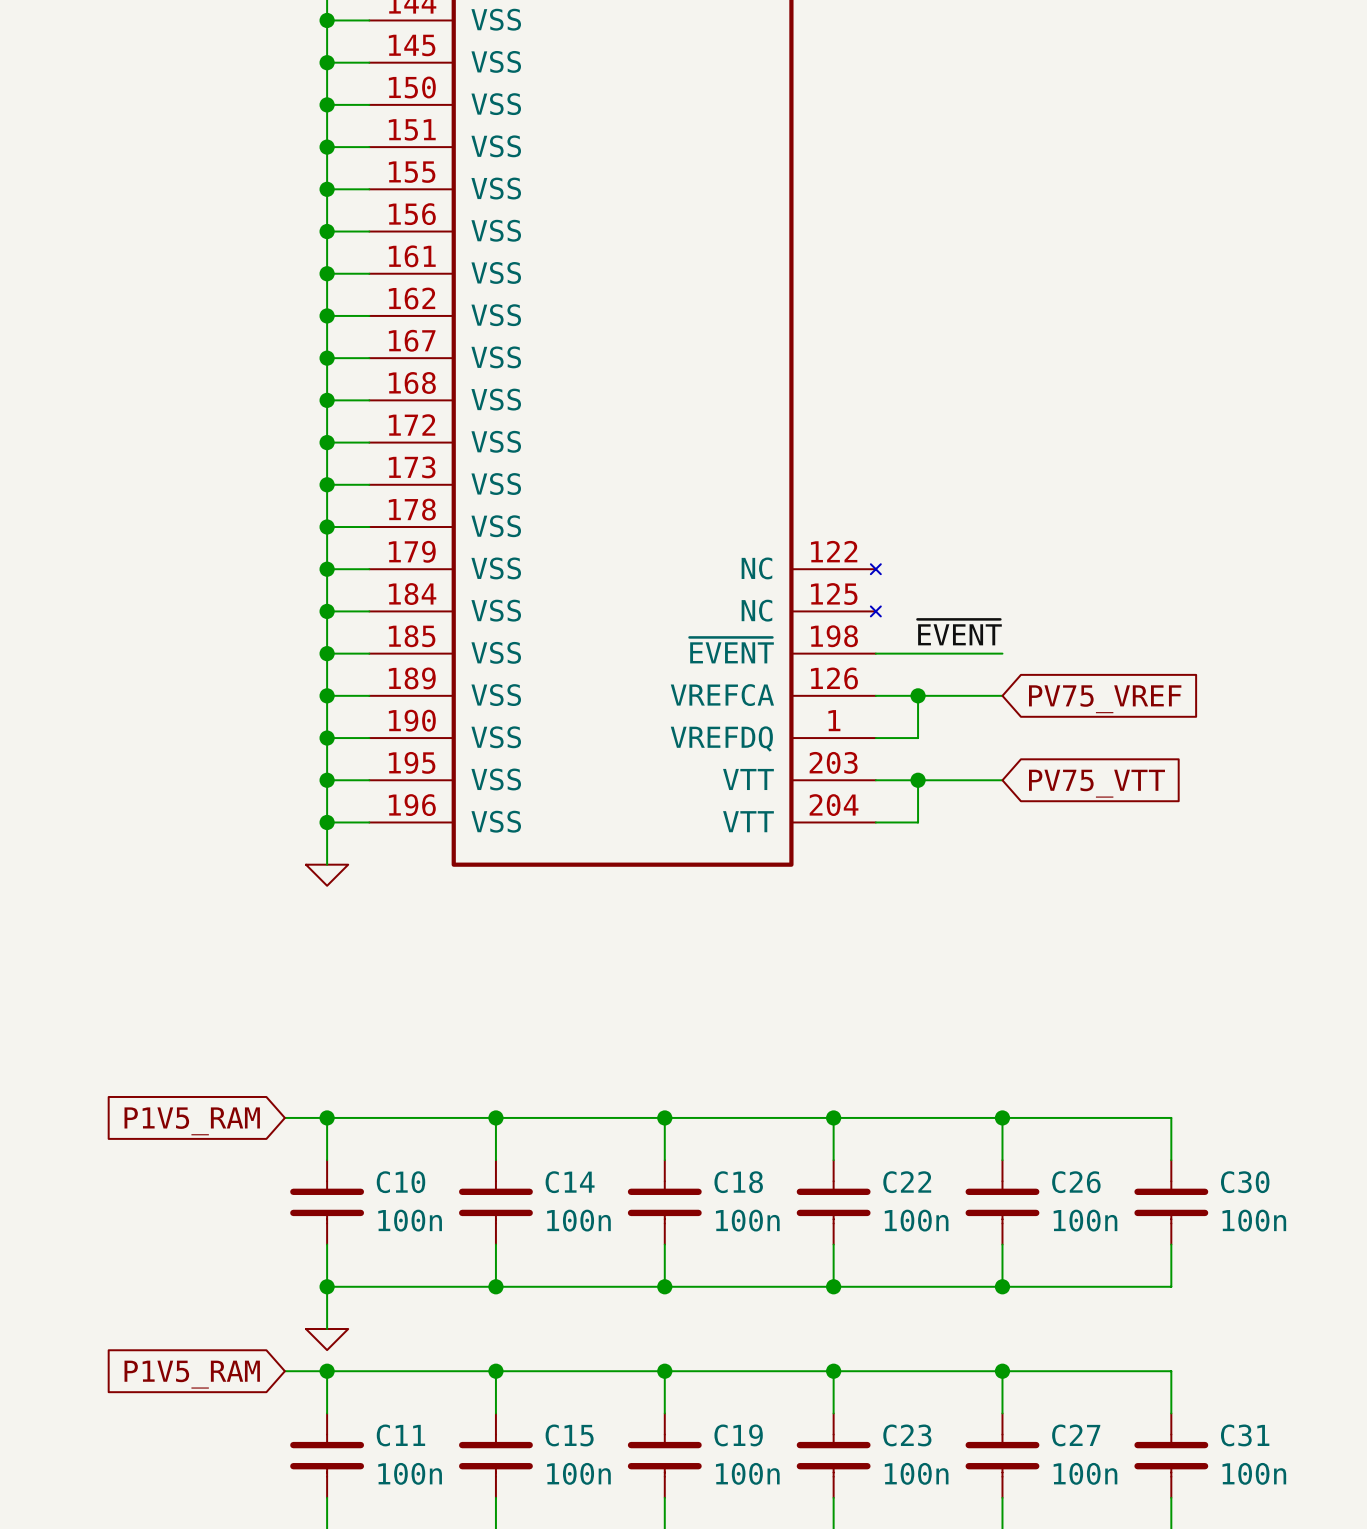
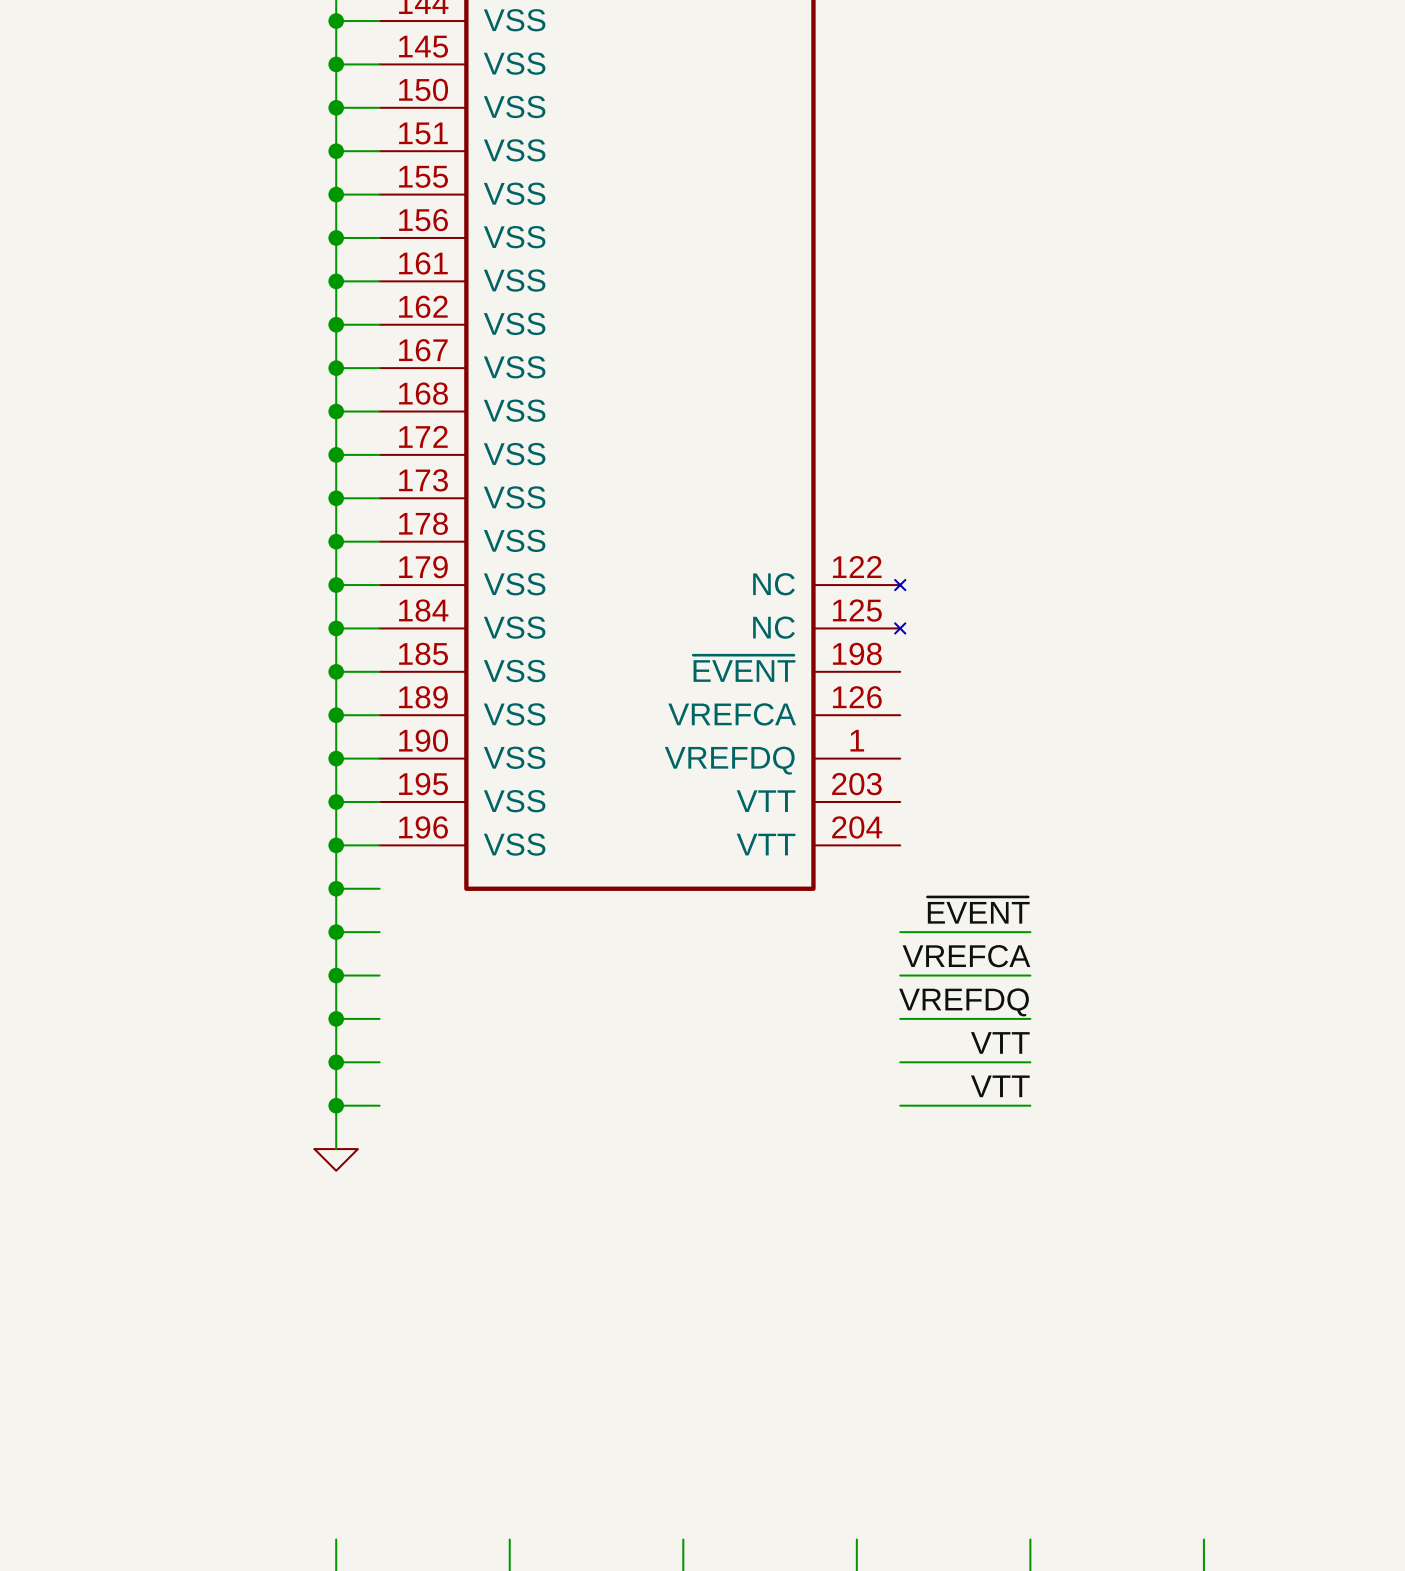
label position: ~{EVENT} (959, 632) -> ~{EVENT} (978, 910)
wire: (875, 653) (1002, 653) -> (900, 932) (1030, 932)
wire: (875, 695) (1002, 695) -> (900, 975) (1030, 975)
wire: (918, 695) (918, 738) (875, 738) -> none
junction: (918, 695) -> none
global label: PV75_VREF (1105, 699) -> none
wire: (875, 780) (1002, 780) -> (900, 1062) (1030, 1062)
wire: (918, 780) (918, 822) (875, 822) -> none
junction: (918, 780) -> none
global label: PV75_VTT (1096, 783) -> none
junction: none -> (336, 888)
power symbol: (327, 875) -> none
wire: none -> (336, 932) (379, 932)
junction: none -> (336, 932)
label: none -> VREFCA (966, 956)
wire: none -> (336, 975) (379, 975)
junction: none -> (336, 975)
label: none -> VREFDQ (964, 1002)
wire: none -> (336, 1018) (379, 1018)
junction: none -> (336, 1018)
wire: none -> (900, 1018) (1030, 1018)
label: none -> VTT (1000, 1042)
wire: none -> (336, 1062) (379, 1062)
junction: none -> (336, 1062)
label: none -> VTT (1000, 1086)
wire: none -> (336, 1105) (379, 1105)
junction: none -> (336, 1105)
wire: none -> (900, 1105) (1030, 1105)
wire: (284, 1117) (1171, 1117) (1171, 1160) -> none
wire: (327, 1117) (327, 1160) -> (336, 1149) (336, 888) (379, 888)
junction: (327, 1117) -> none
wire: (495, 1117) (495, 1160) -> none
junction: (495, 1117) -> none
wire: (664, 1117) (664, 1160) -> none
junction: (664, 1117) -> none
wire: (833, 1117) (833, 1160) -> none
junction: (833, 1117) -> none
wire: (1002, 1117) (1002, 1160) -> none
junction: (1002, 1117) -> none
global label: P1V5_RAM (192, 1121) -> none
power symbol: none -> (336, 1159)
C10: 100n (327, 1202) -> none
C14: 100n (495, 1202) -> none
C18: 100n (664, 1202) -> none
C22: 100n (833, 1202) -> none
C26: 100n (1002, 1202) -> none
C30: 100n (1171, 1202) -> none
wire: (327, 1244) (327, 1329) -> none
wire: (495, 1244) (495, 1286) -> none
wire: (664, 1244) (664, 1286) -> none
wire: (833, 1244) (833, 1286) -> none
wire: (1002, 1244) (1002, 1286) -> none
wire: (1171, 1244) (1171, 1286) (327, 1286) -> none
junction: (327, 1286) -> none
junction: (495, 1286) -> none
junction: (664, 1286) -> none
junction: (833, 1286) -> none
junction: (1002, 1286) -> none
power symbol: (327, 1339) -> none
wire: (284, 1371) (1171, 1371) (1171, 1413) -> none
wire: (327, 1371) (327, 1413) -> none
junction: (327, 1371) -> none
wire: (495, 1371) (495, 1413) -> none
junction: (495, 1371) -> none
wire: (664, 1371) (664, 1413) -> none
junction: (664, 1371) -> none
wire: (833, 1371) (833, 1413) -> none
junction: (833, 1371) -> none
wire: (1002, 1371) (1002, 1413) -> none
junction: (1002, 1371) -> none
global label: P1V5_RAM (192, 1374) -> none
C11: 100n (327, 1455) -> none
C15: 100n (495, 1455) -> none
C19: 100n (664, 1455) -> none
C23: 100n (833, 1455) -> none
C27: 100n (1002, 1455) -> none
C31: 100n (1171, 1455) -> none

